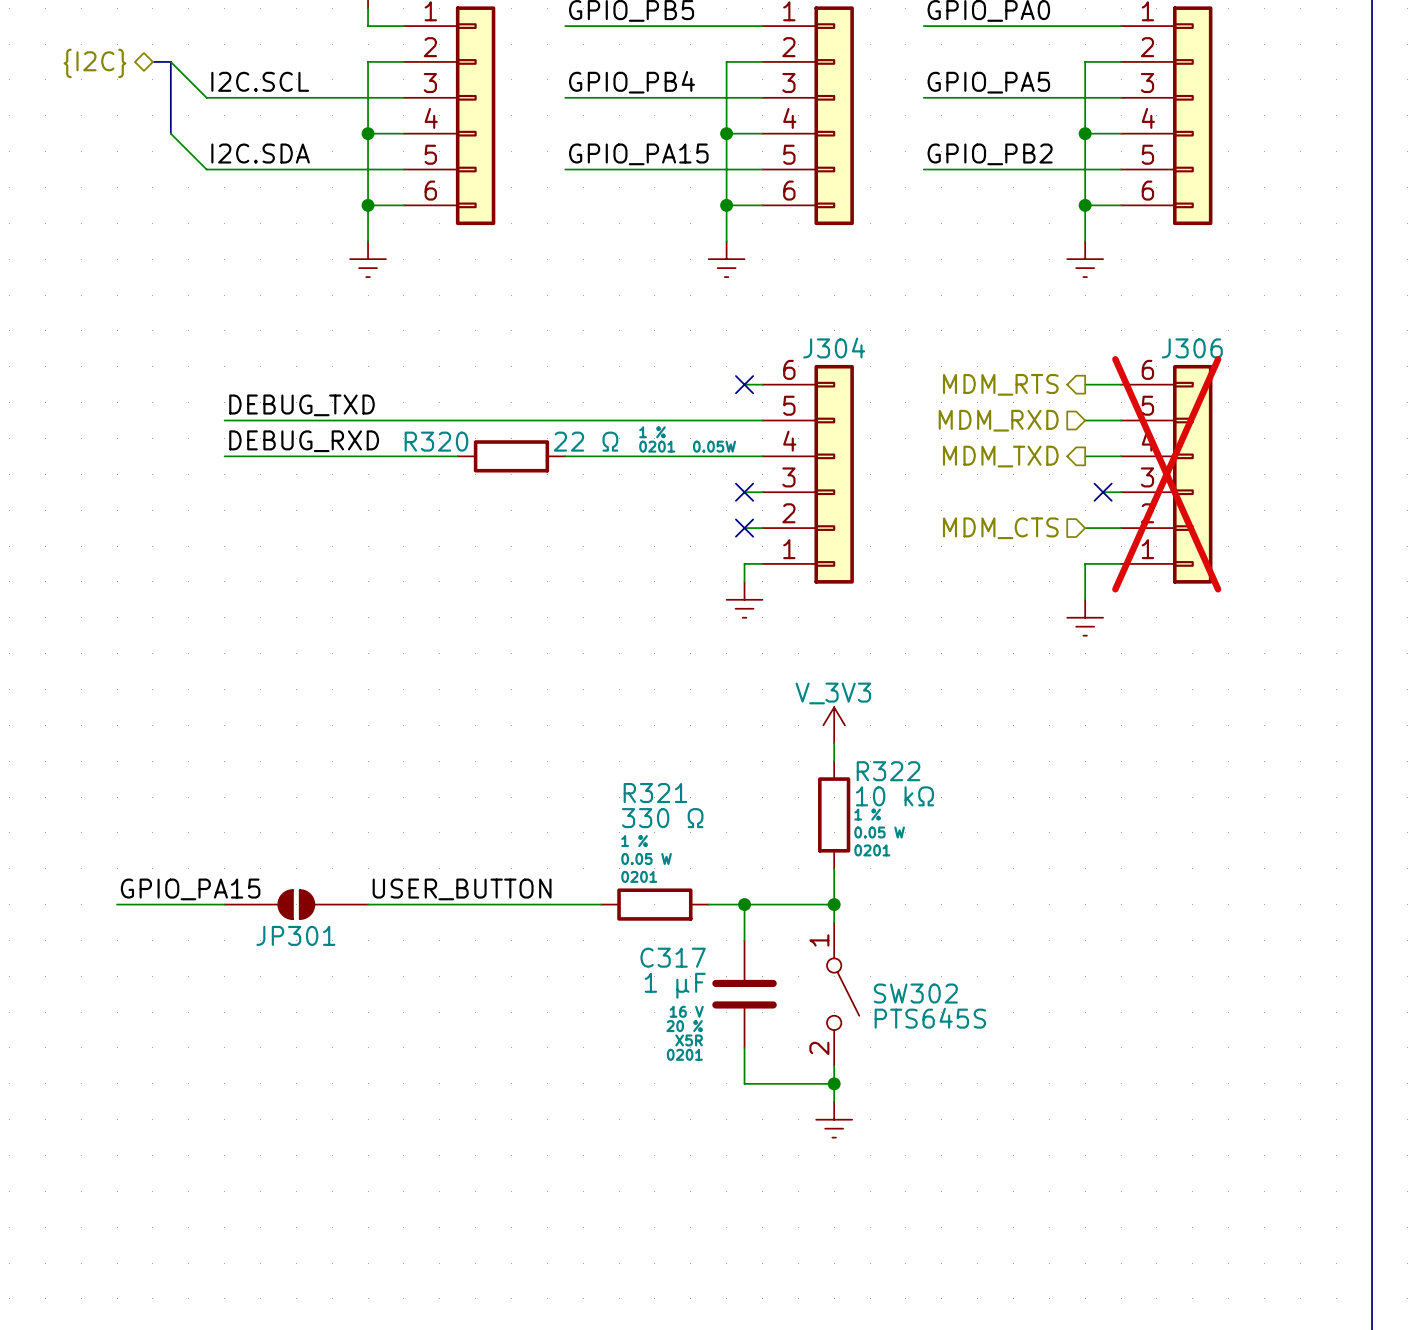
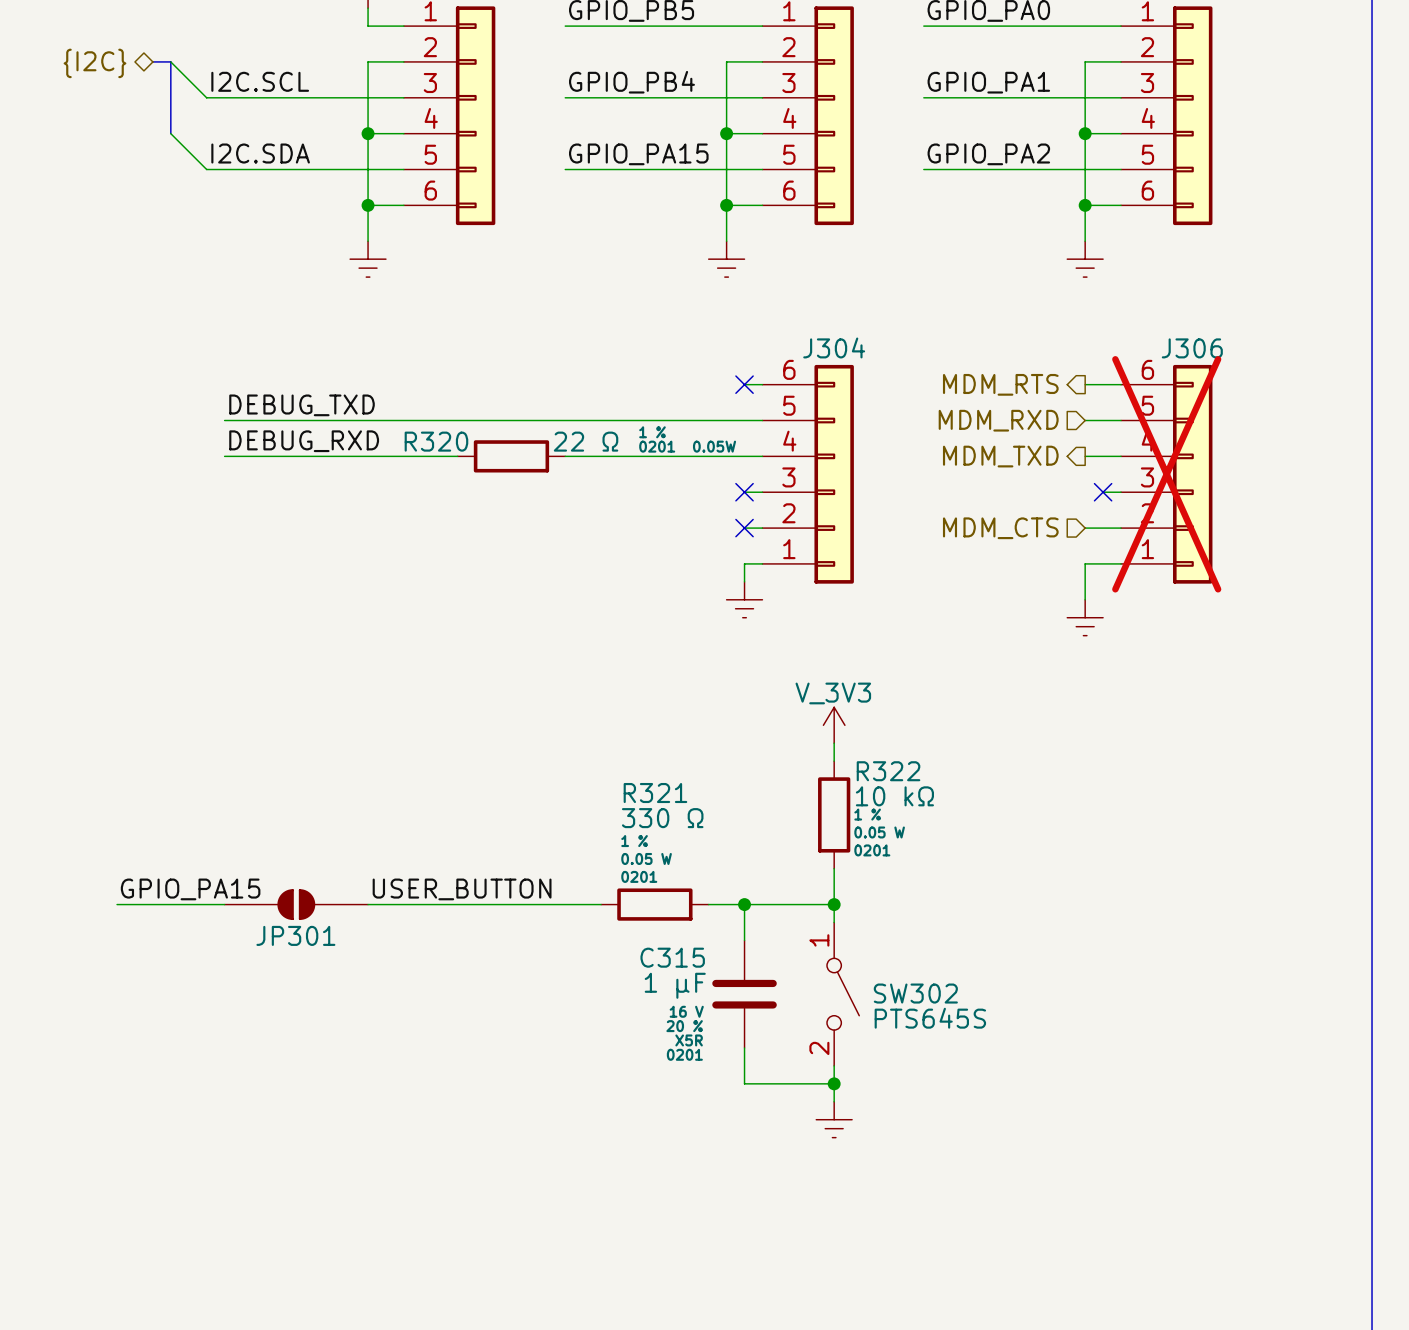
label: GPIO_PA5 (988, 82) -> GPIO_PA1 (988, 82)
label: GPIO_PB2 (990, 154) -> GPIO_PA2 (988, 154)
C317 name: C317 (673, 957) -> C315 (672, 957)

